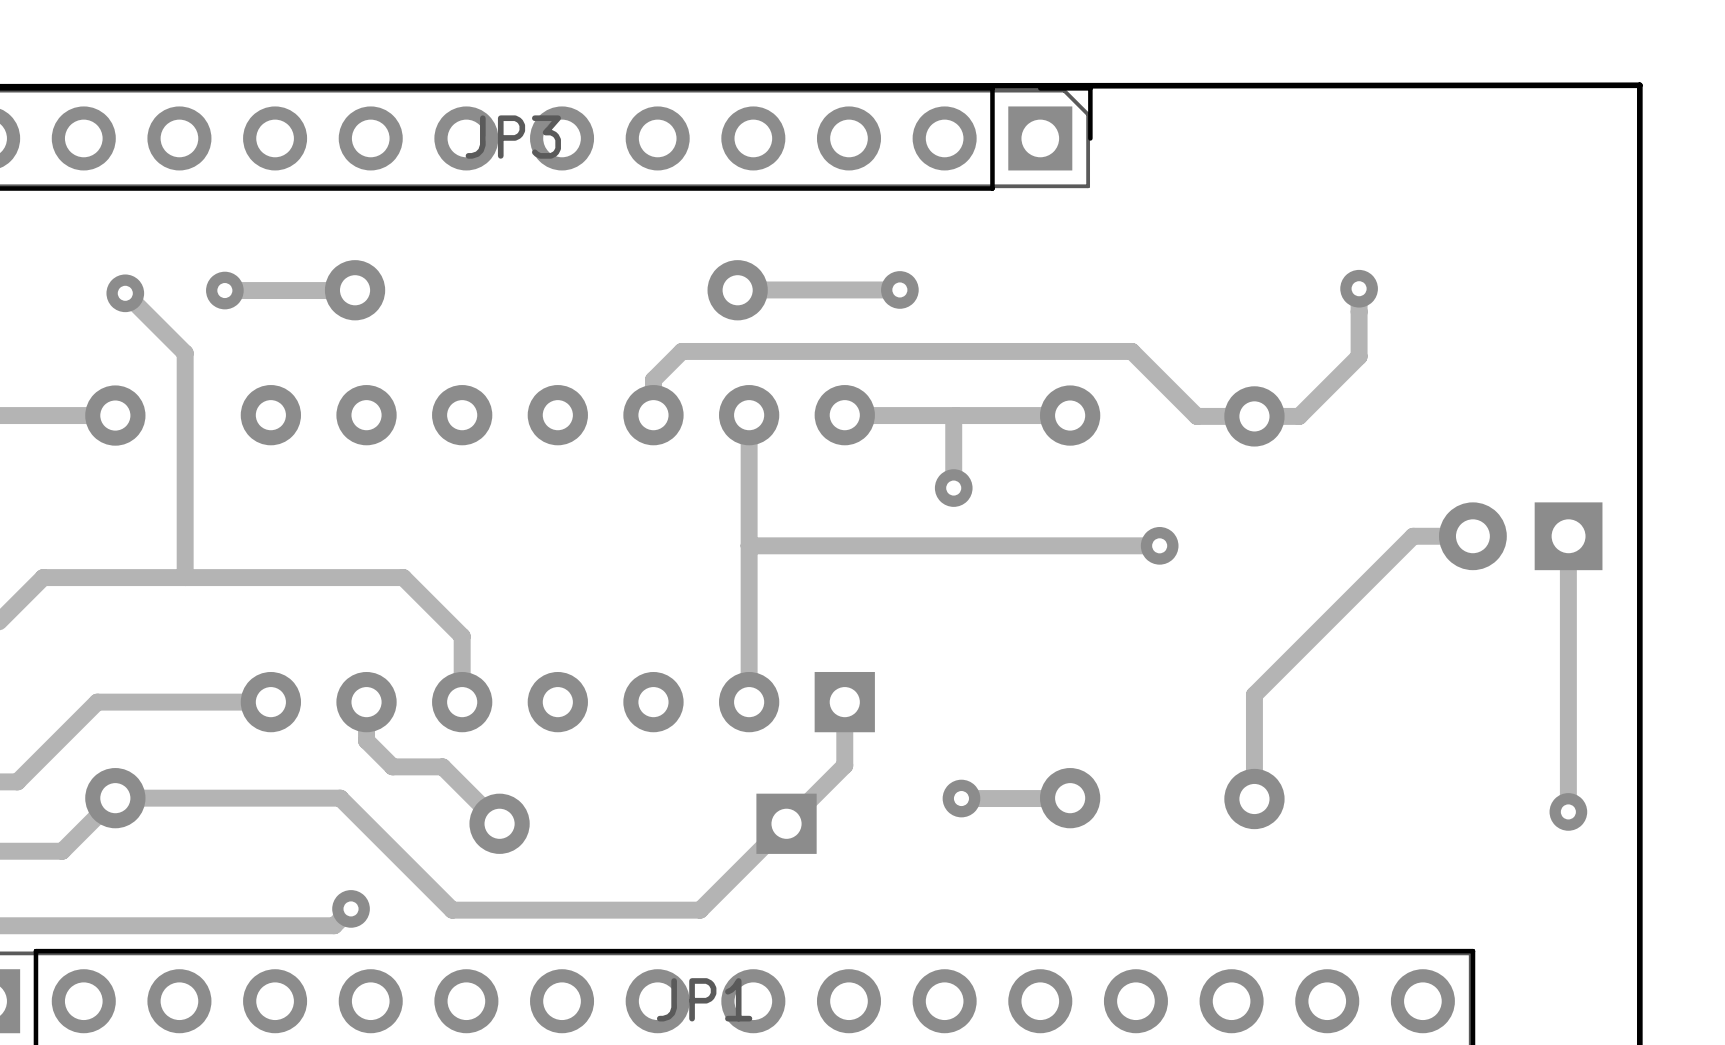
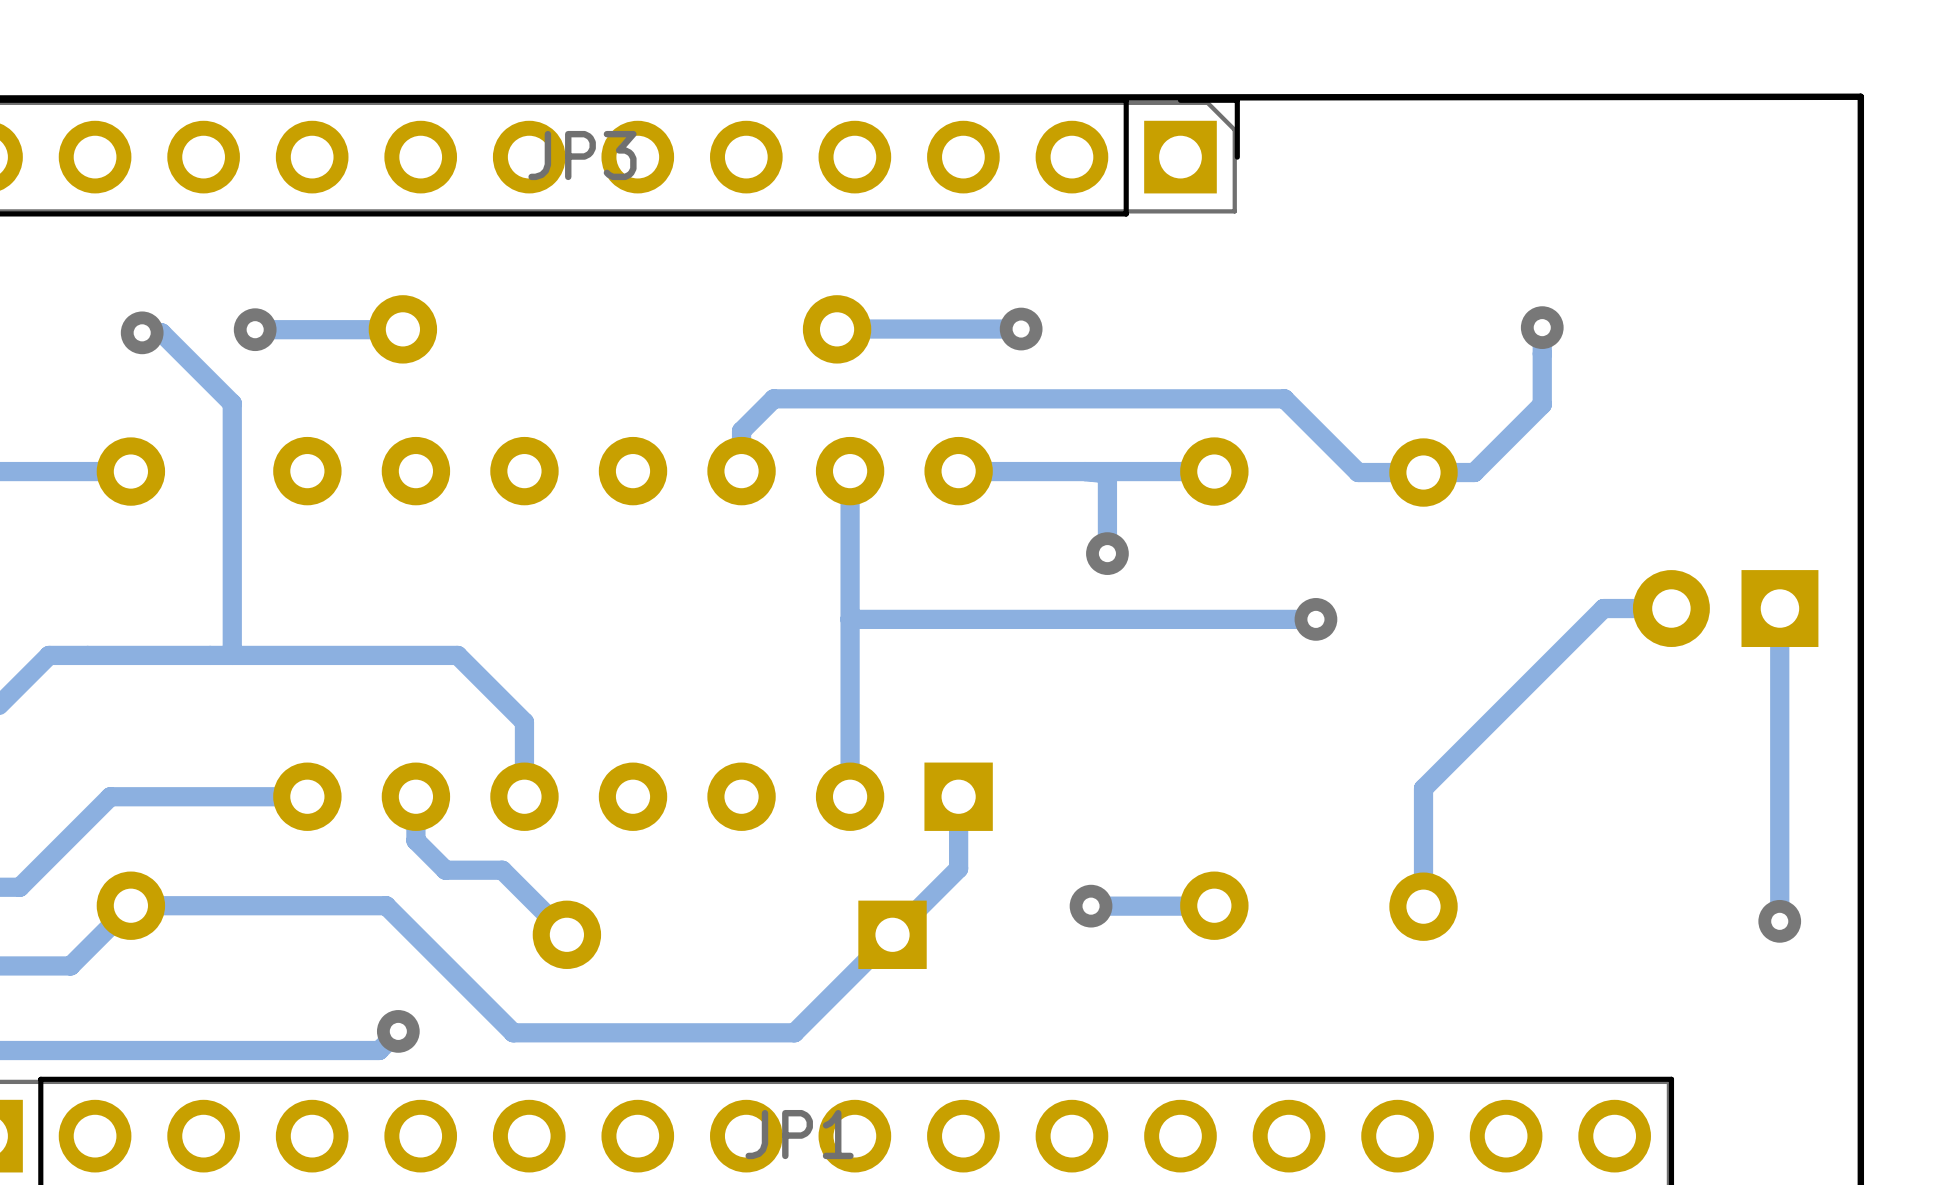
track: (125, 293) (185, 353) (185, 577) -> (142, 332) (161, 332) (232, 403) (232, 655)
track: (956, 415) (953, 417) (953, 488) -> (1084, 471) (1107, 473) (1107, 553)
via position: (953, 488) -> (1107, 553)

